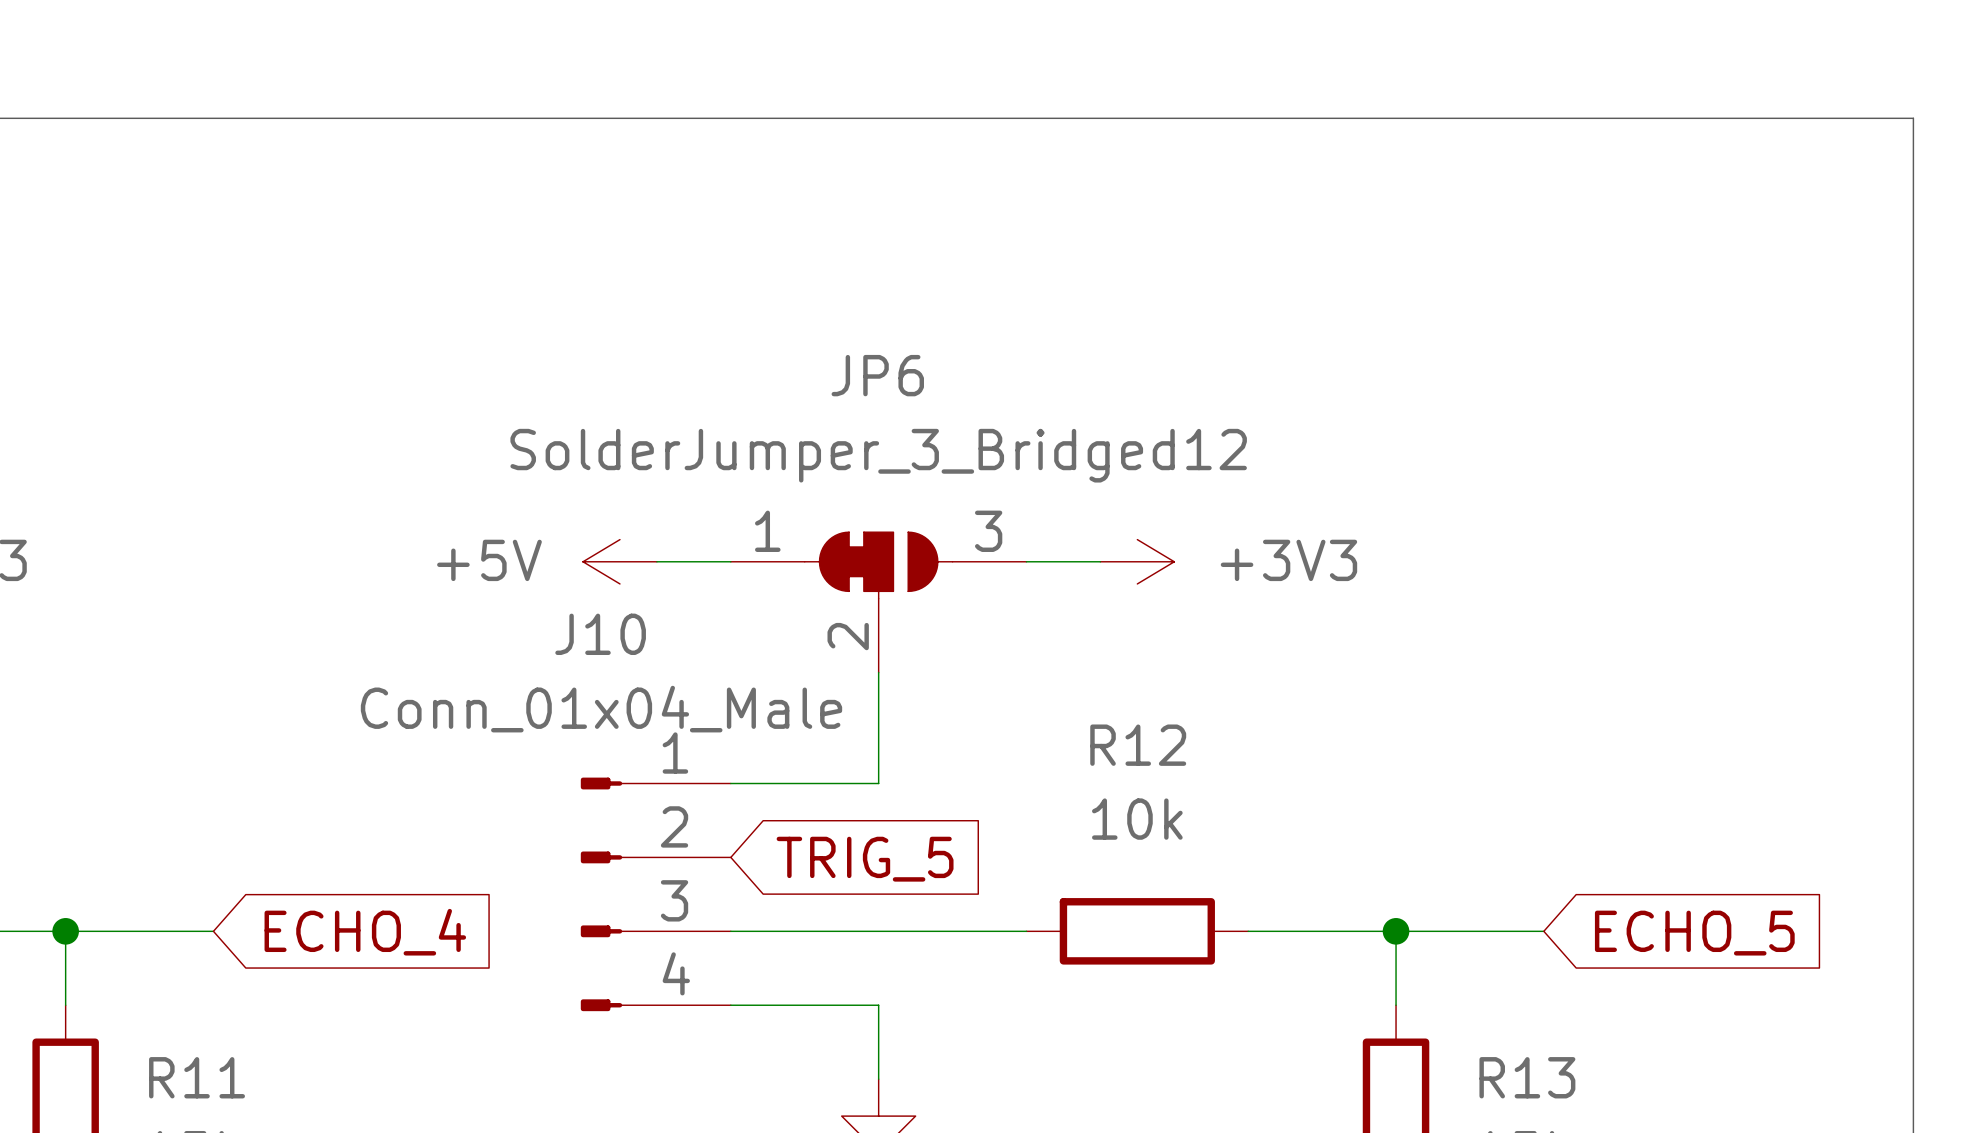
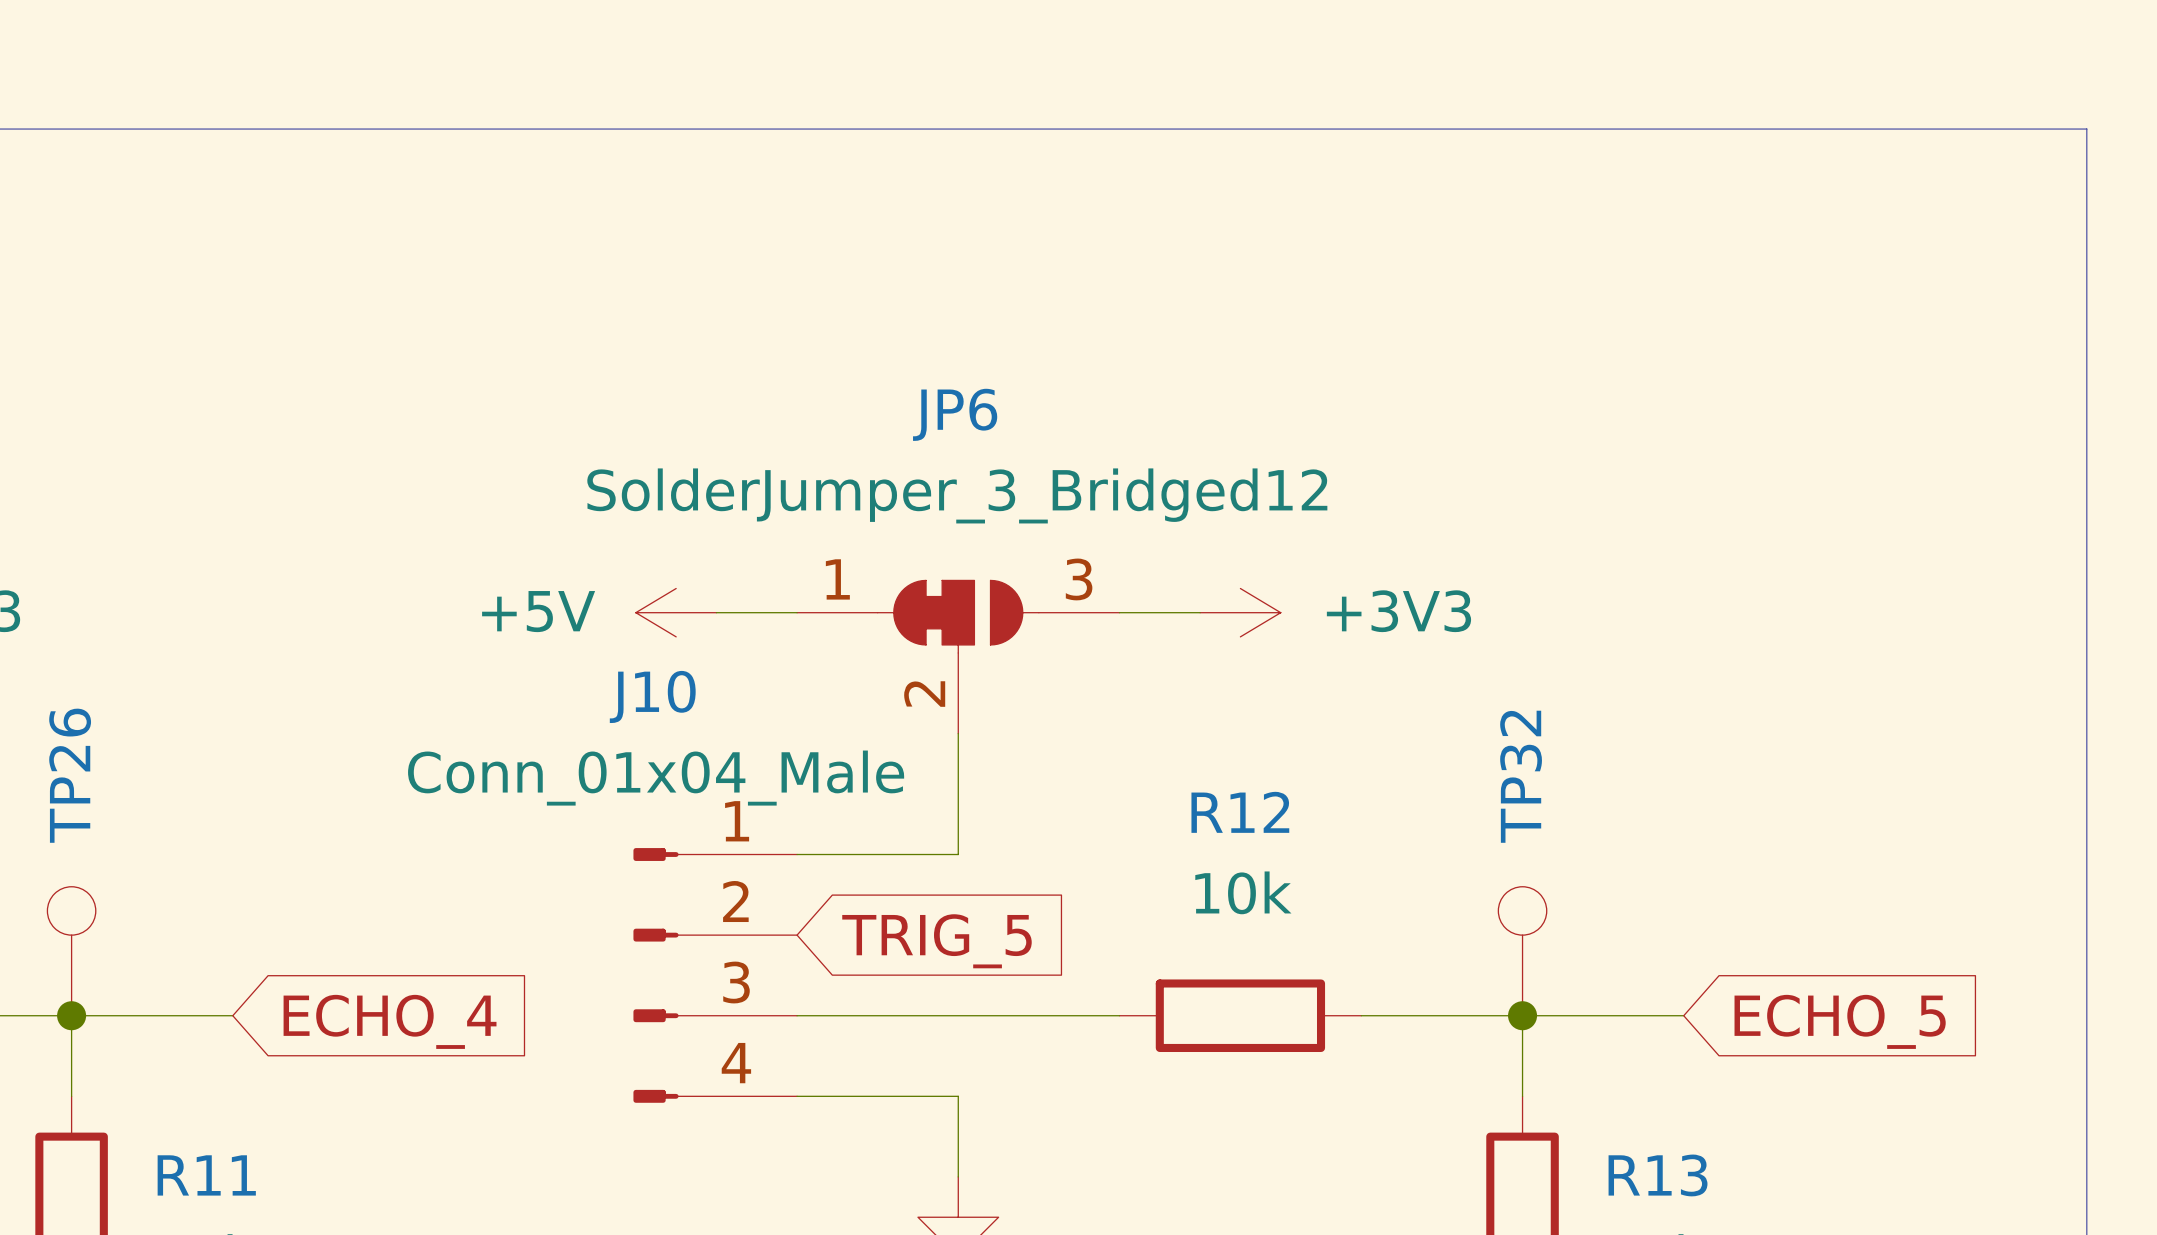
TP26: none -> (71, 951)
TP32: none -> (1522, 951)

